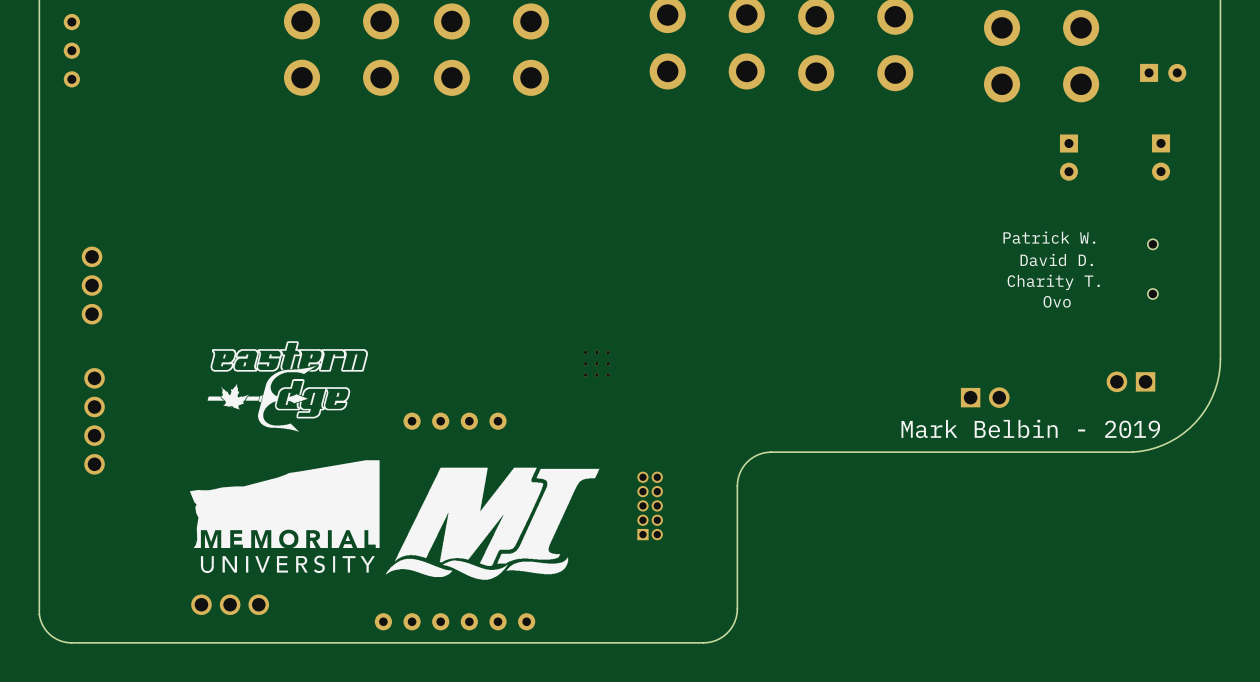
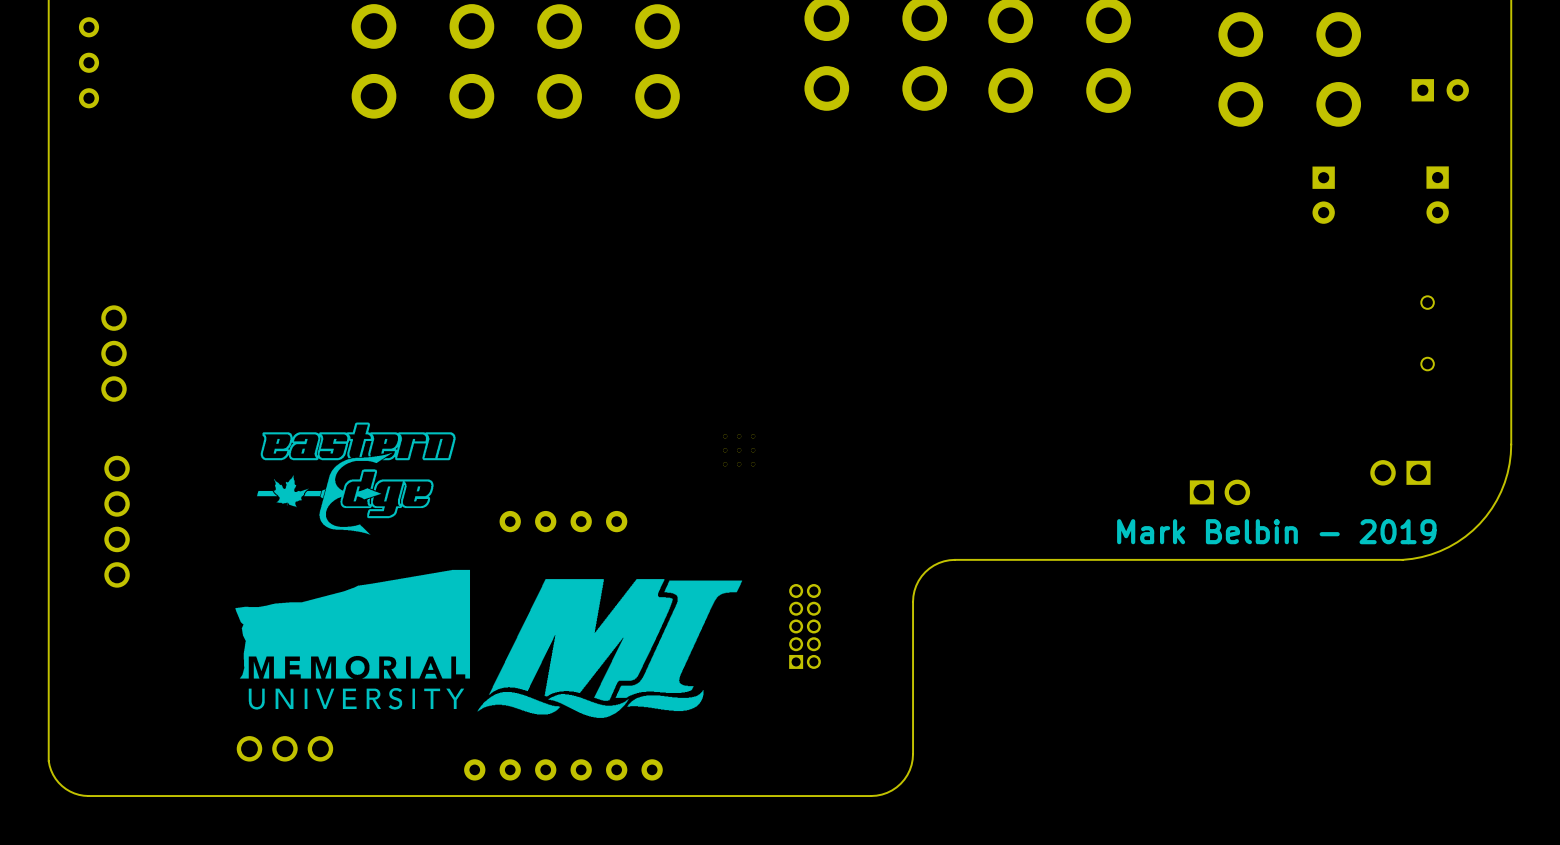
text: Patrick W. (1049, 237) -> none
text: David D. (1056, 259) -> none
text: Charity T. (1053, 282) -> none
text: Ovo (1057, 301) -> none

